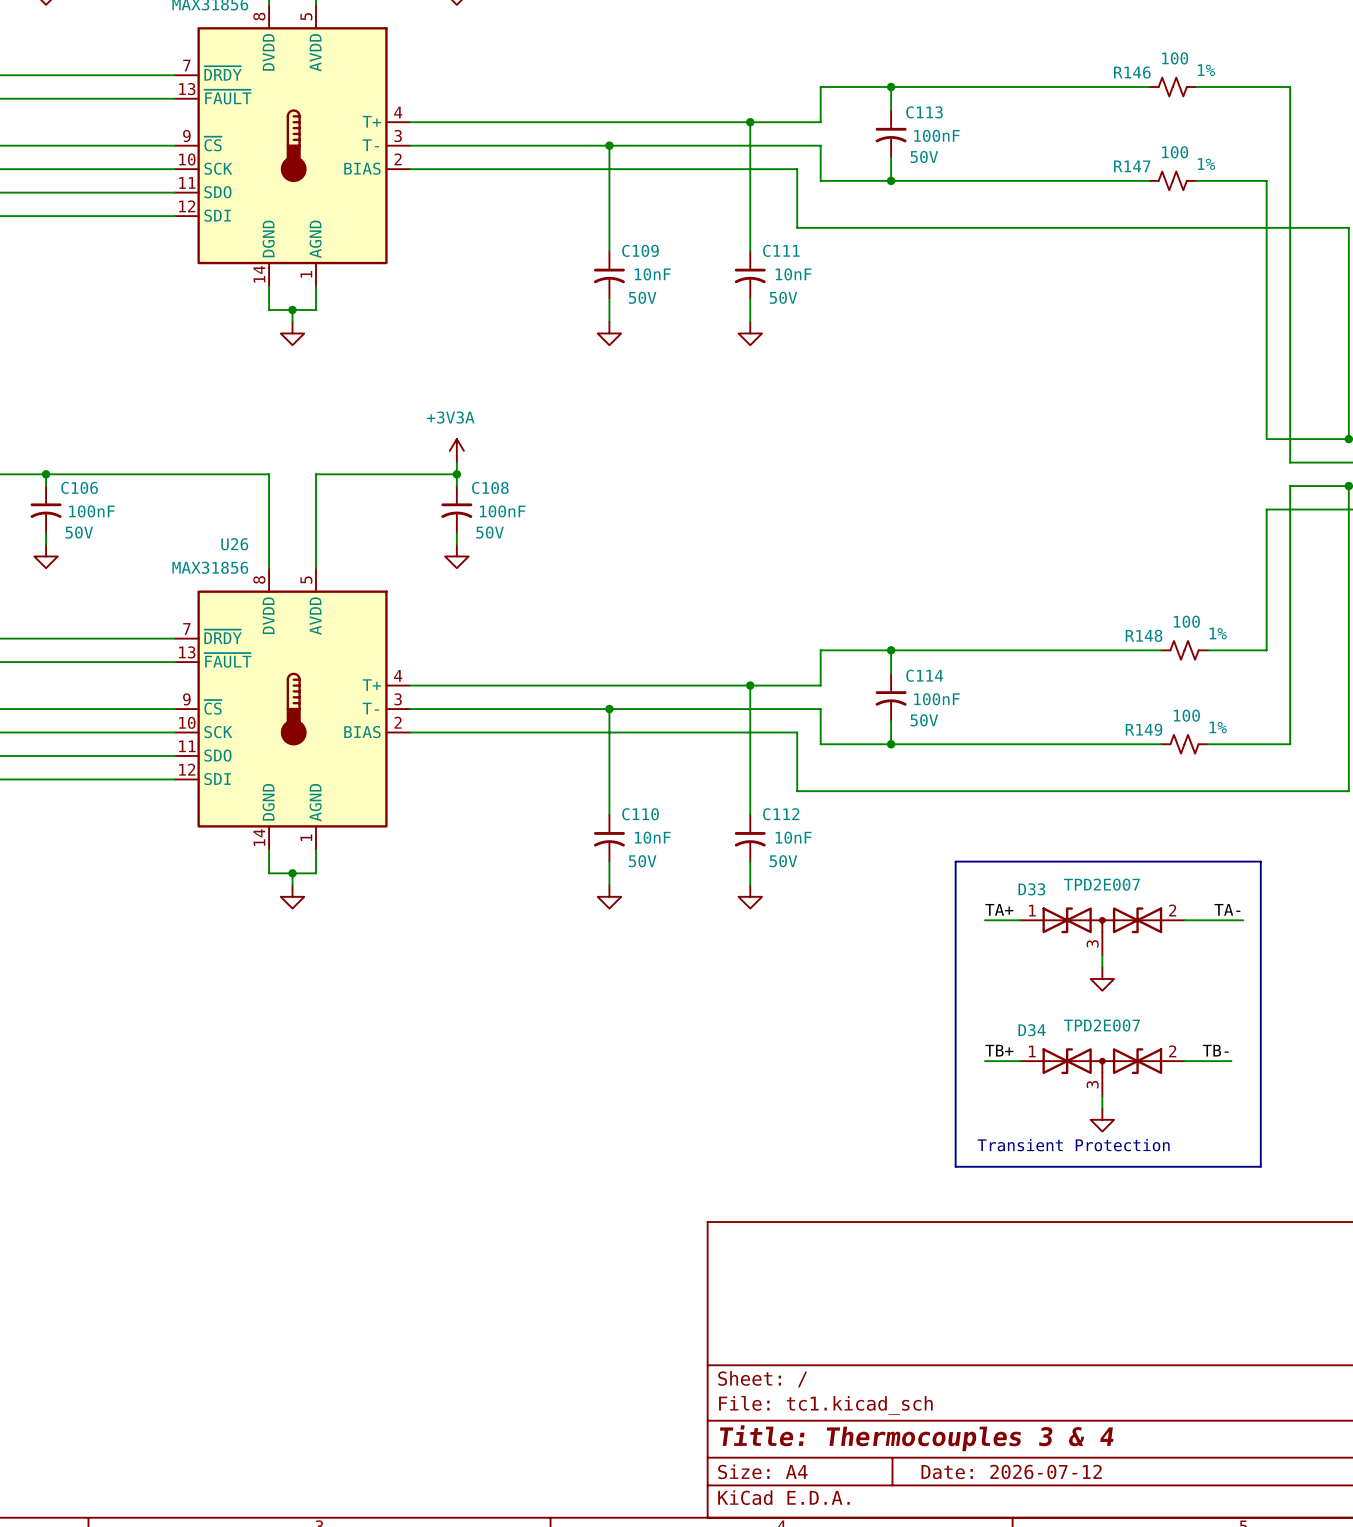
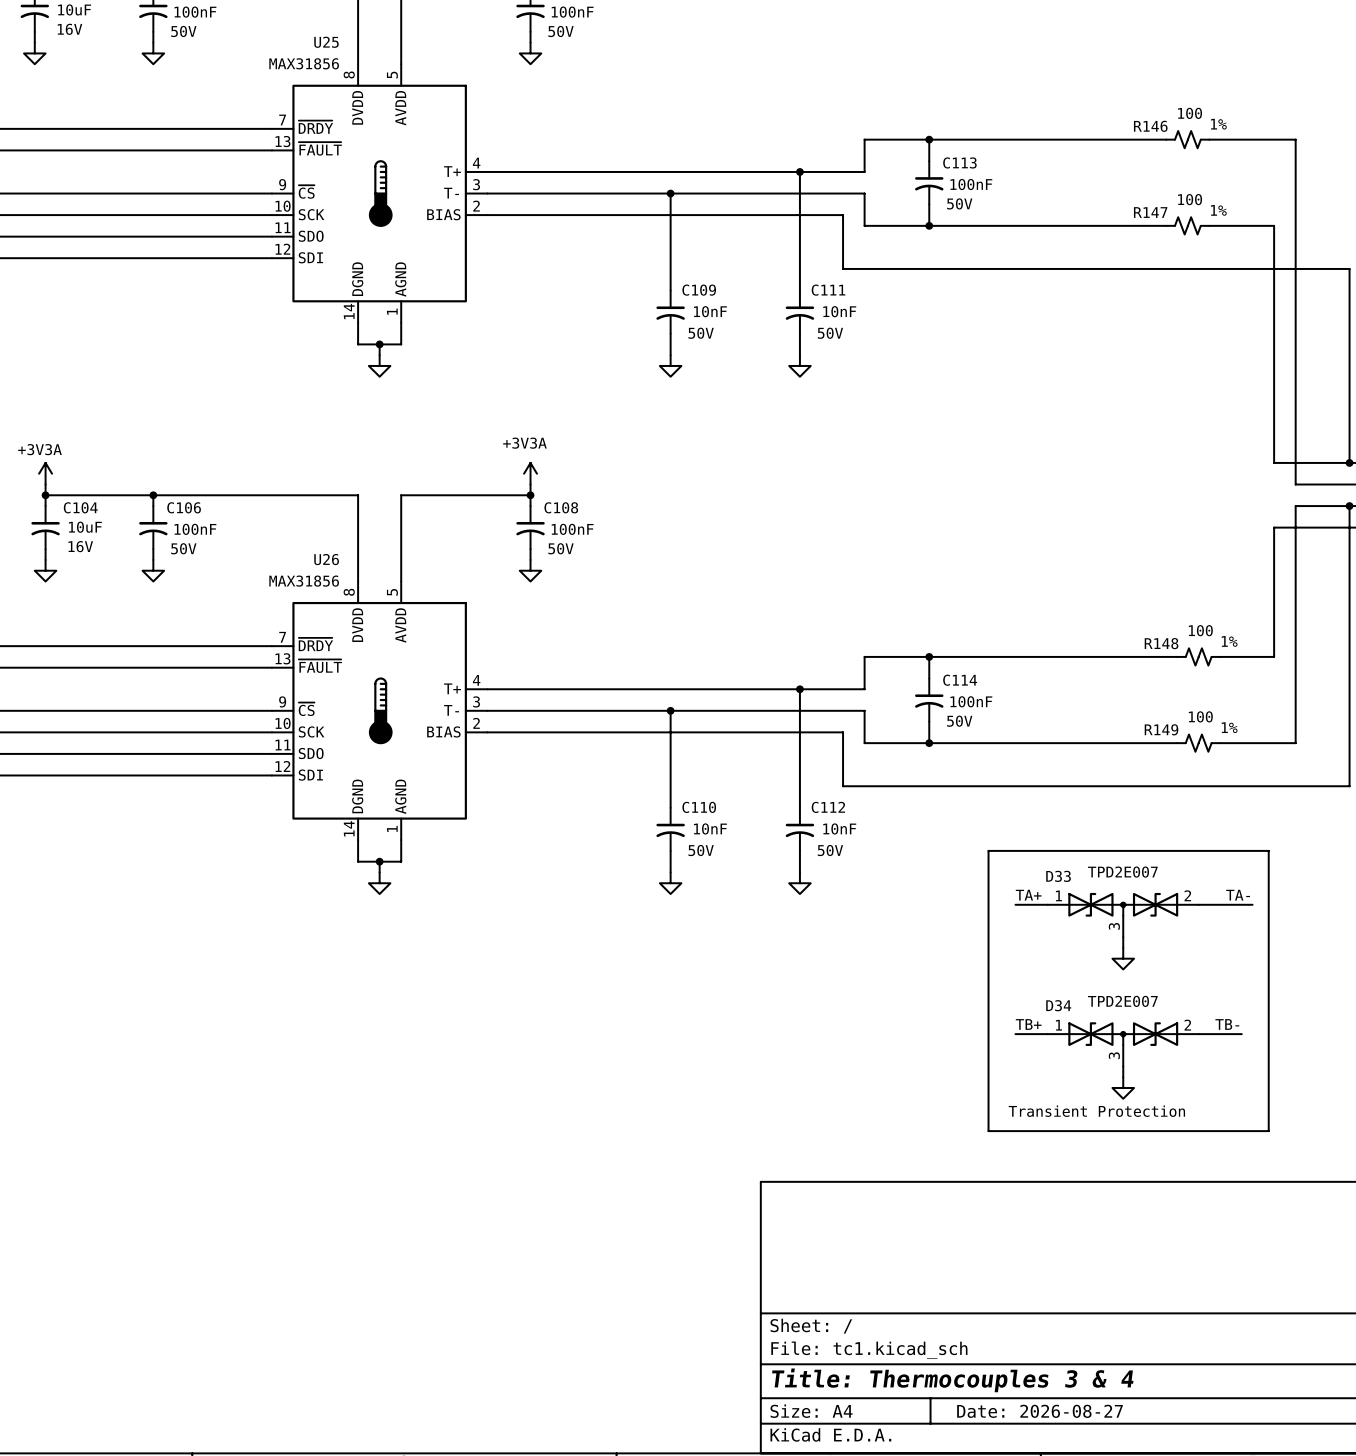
title block: Date: 2026-07-12 (1011, 1471) -> Date: 2026-08-27 (1040, 1411)

